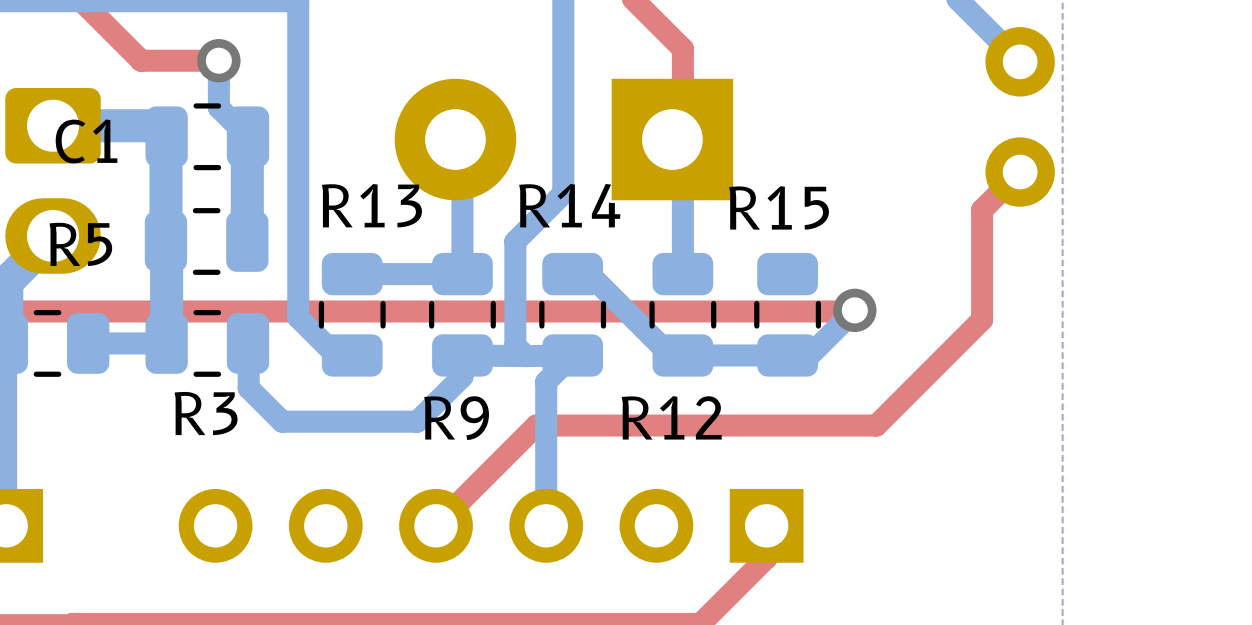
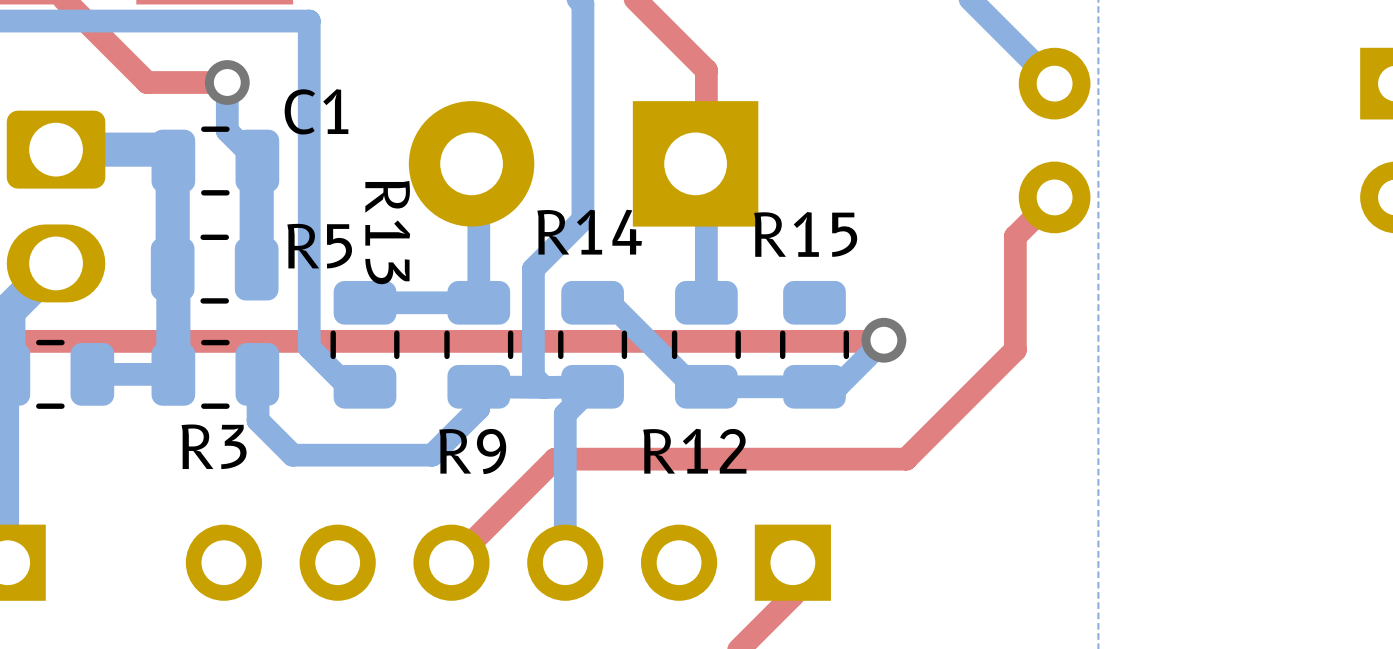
C1 name position: C1 (86, 141) -> C1 (316, 111)
R13 name rotation: 0° (371, 205) -> 90° clockwise (387, 232)
R5 name position: R5 (80, 244) -> R5 (319, 246)

